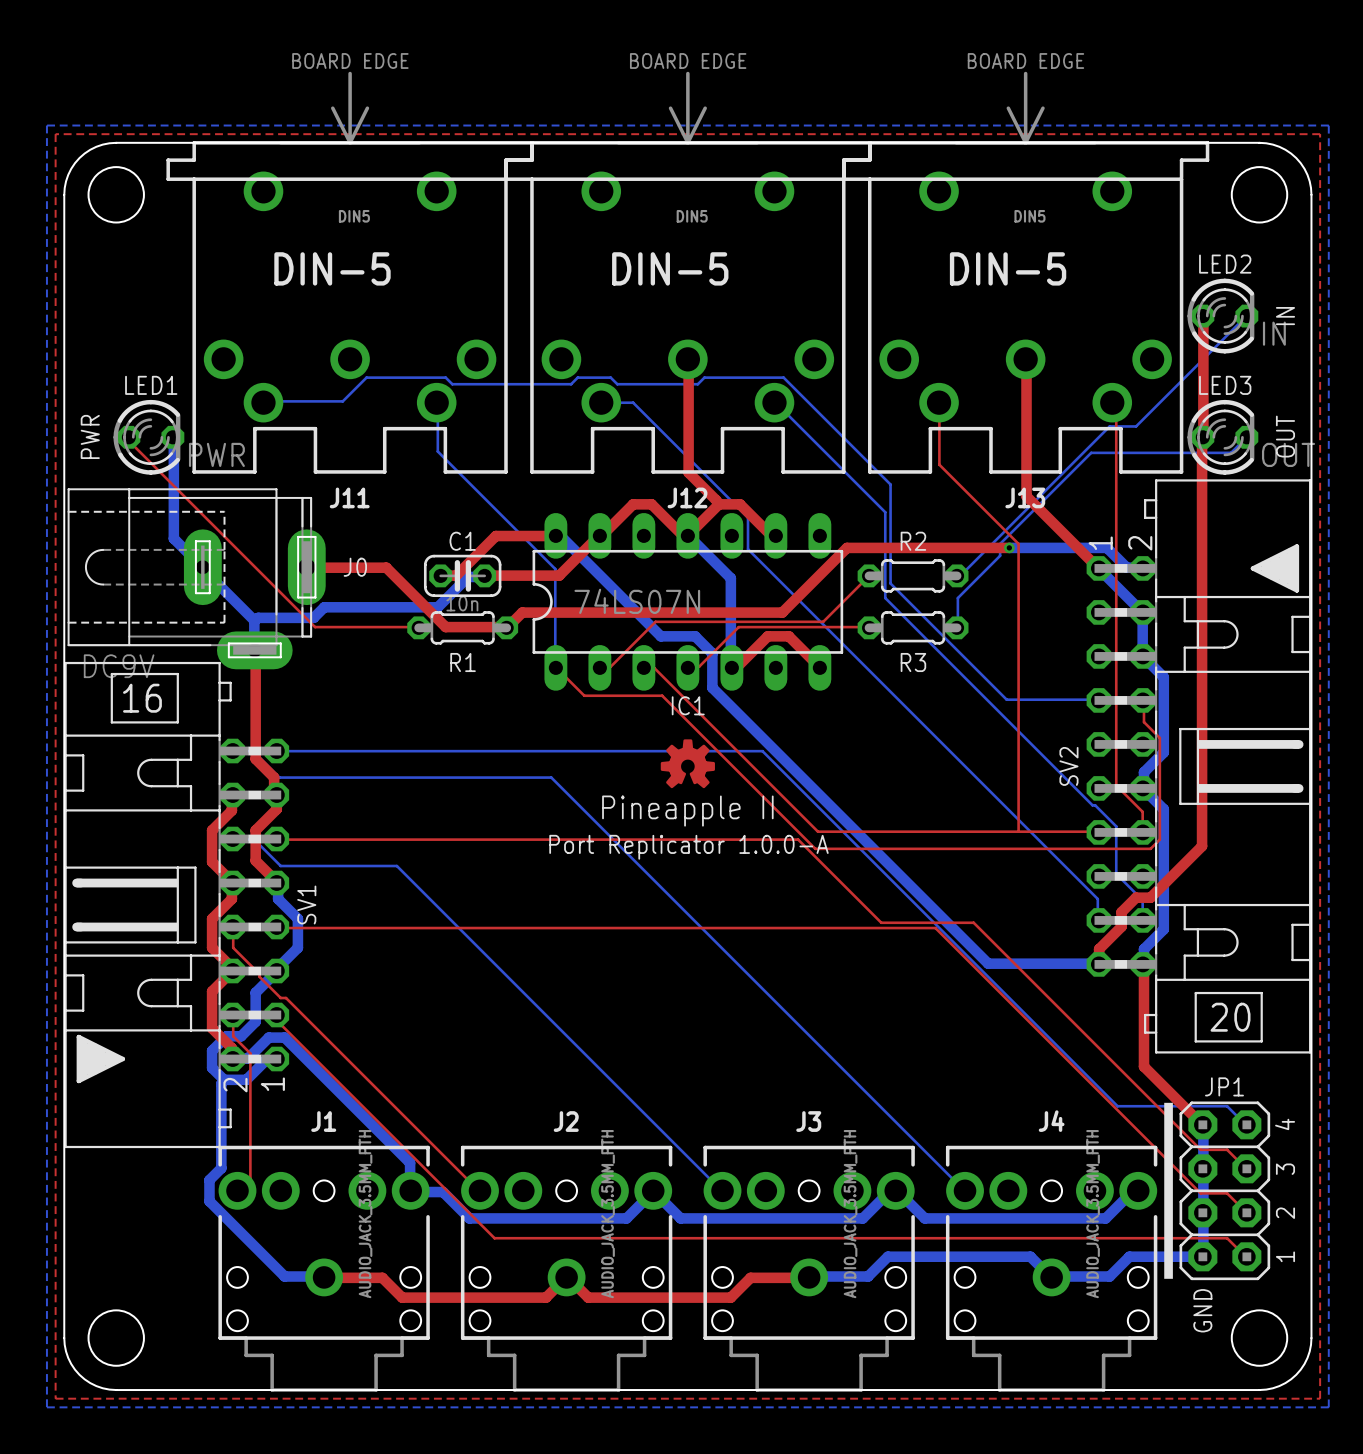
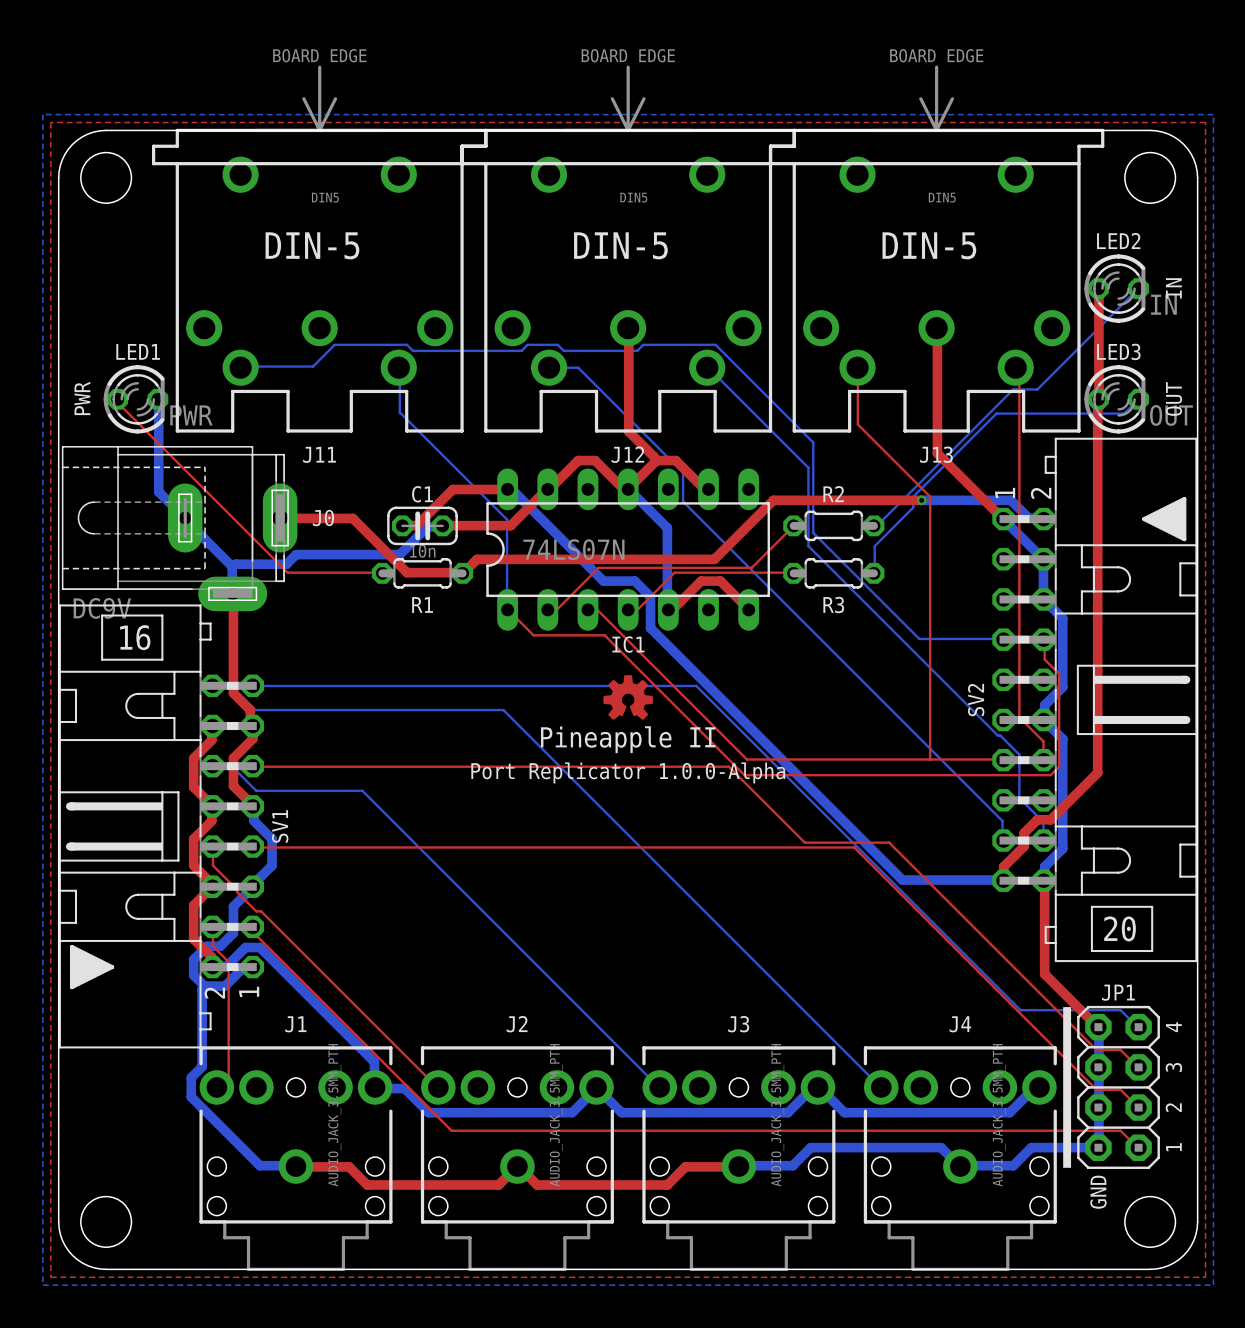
text: Port Replicator 1.0.0-A (688, 847) -> Port Replicator 1.0.0-Alpha (628, 772)

